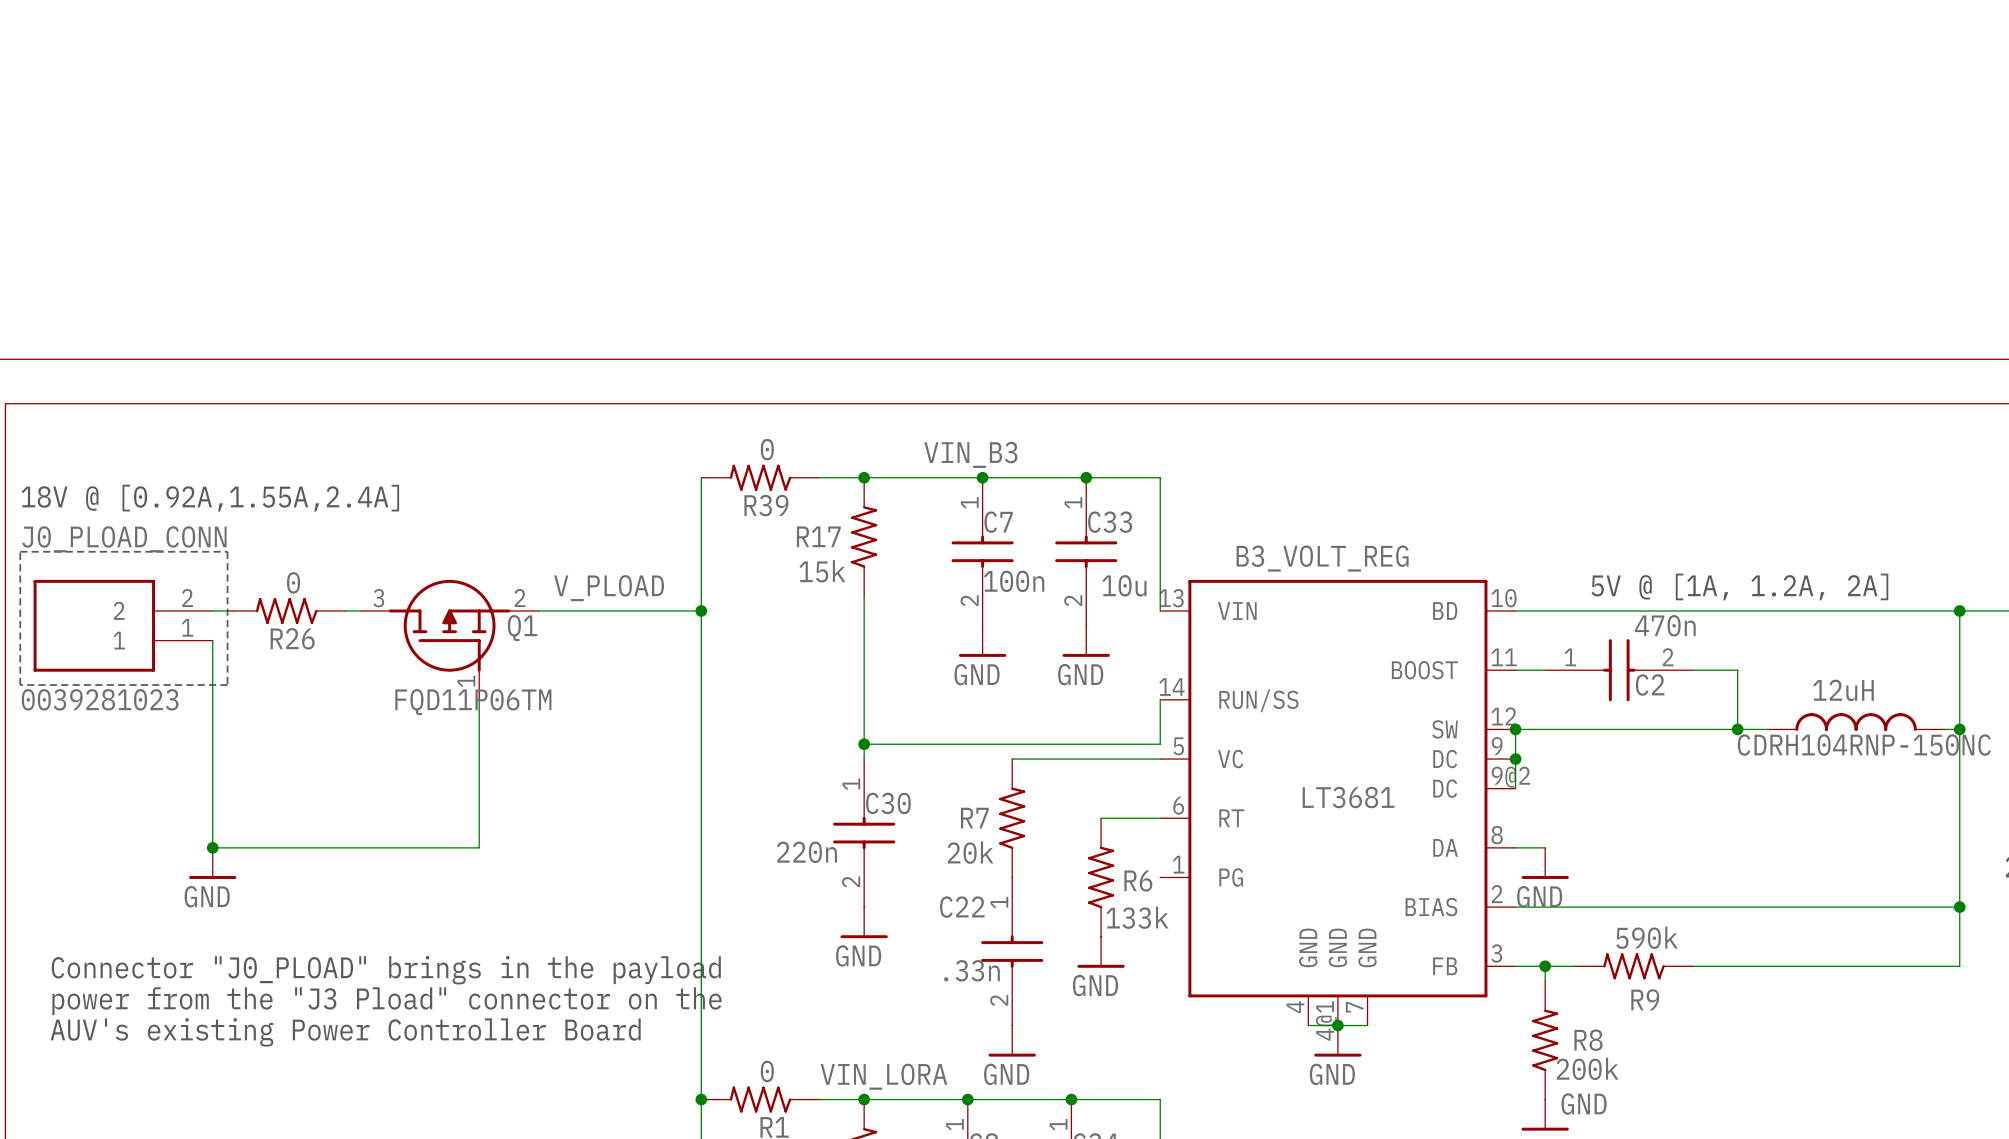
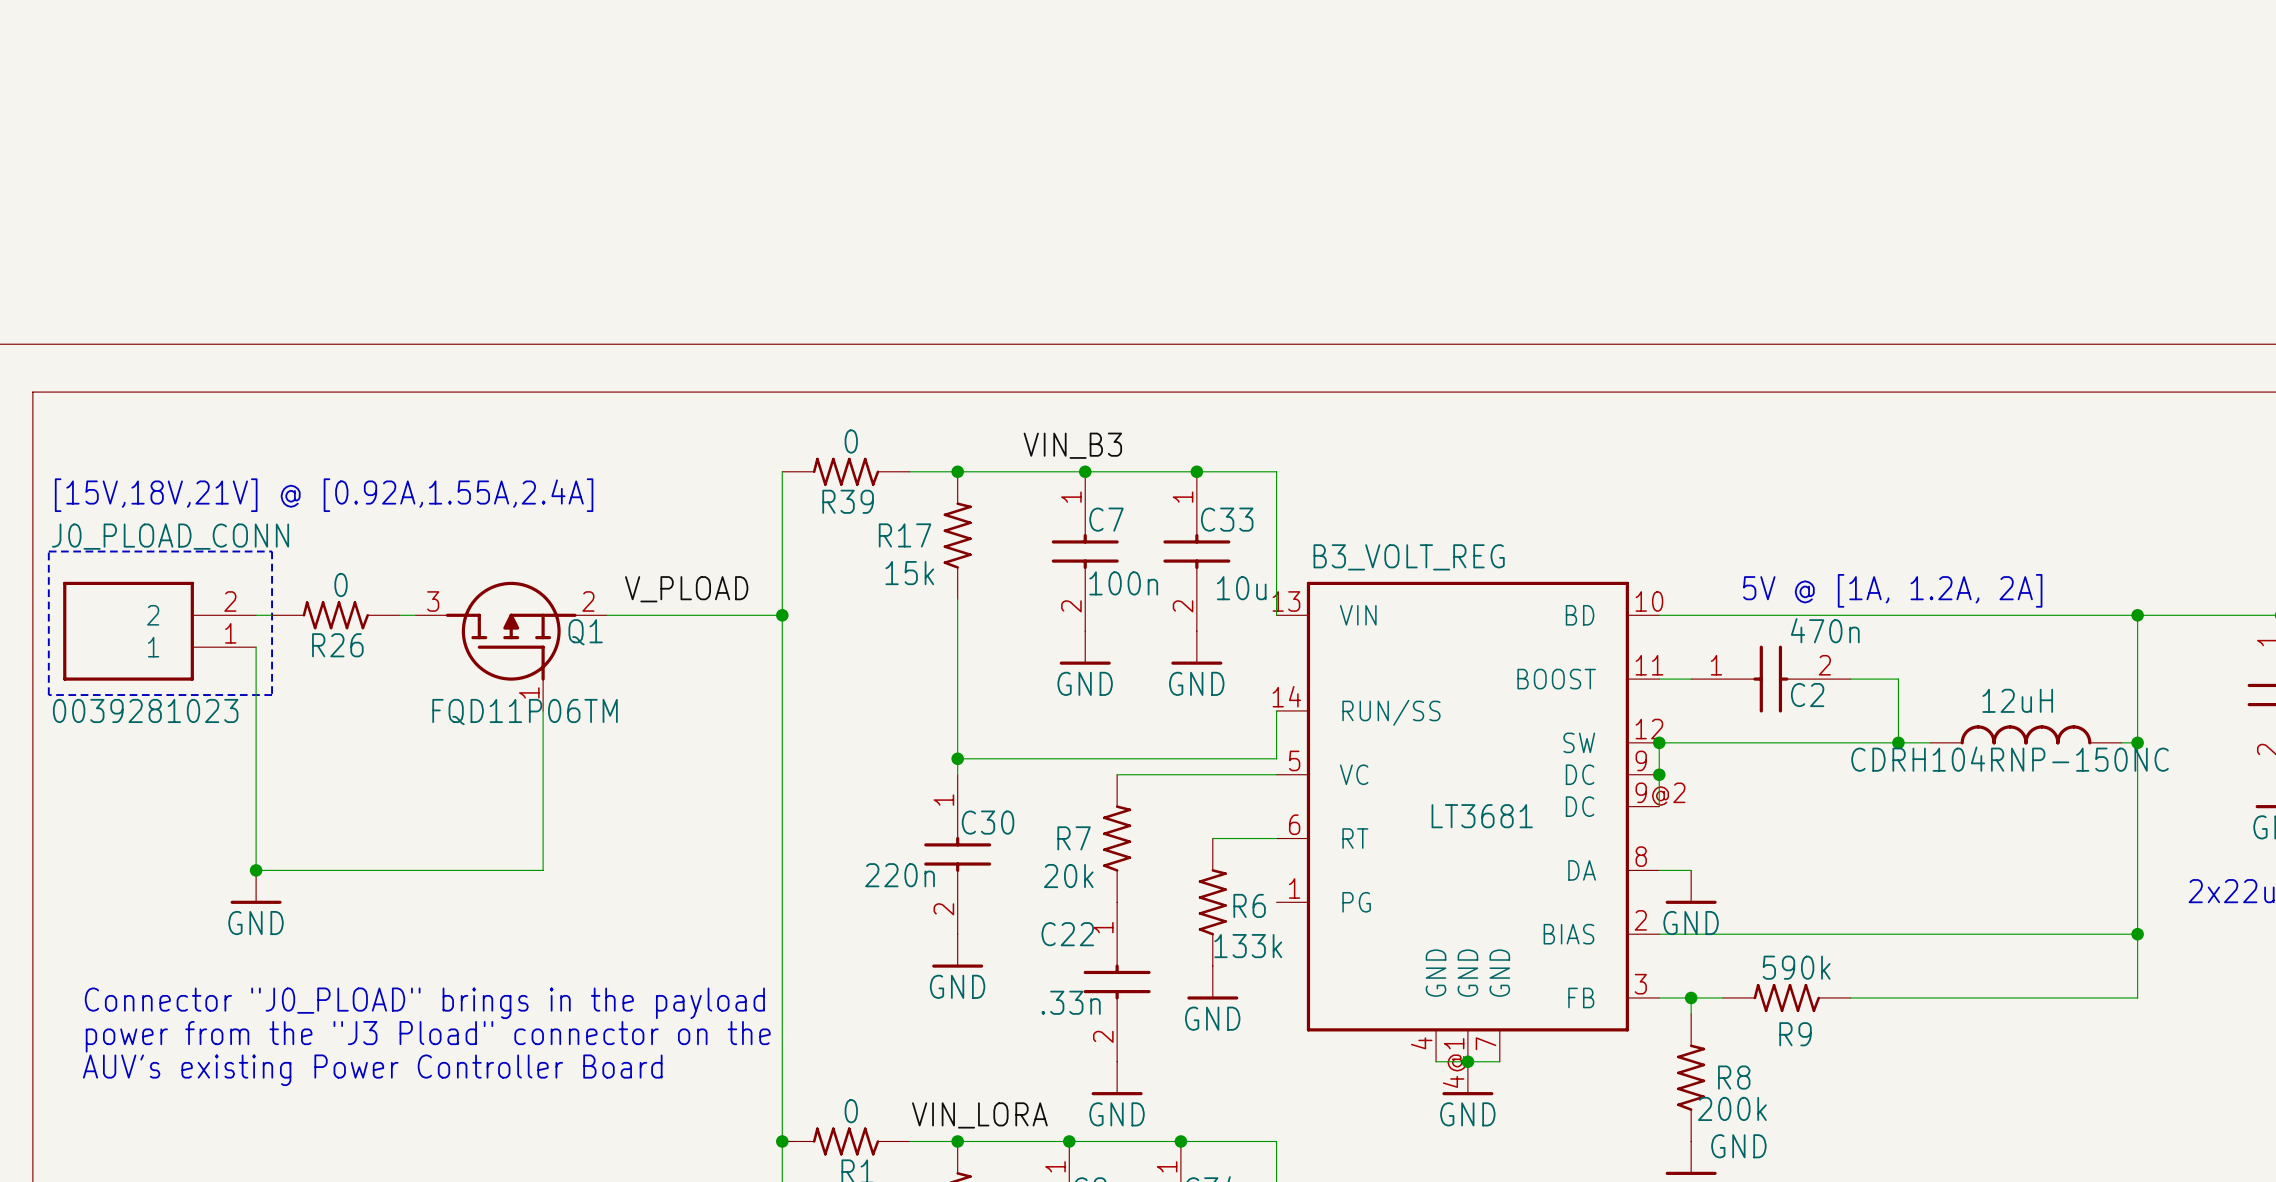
text: 18V @ [0.92A,1.55A,2.4A] (210, 498) -> [15V,18V,21V] @ [0.92A,1.55A,2.4A] (324, 495)
B3_VOLT_REG name position: B3_VOLT_REG (1322, 558) -> B3_VOLT_REG (1409, 557)

